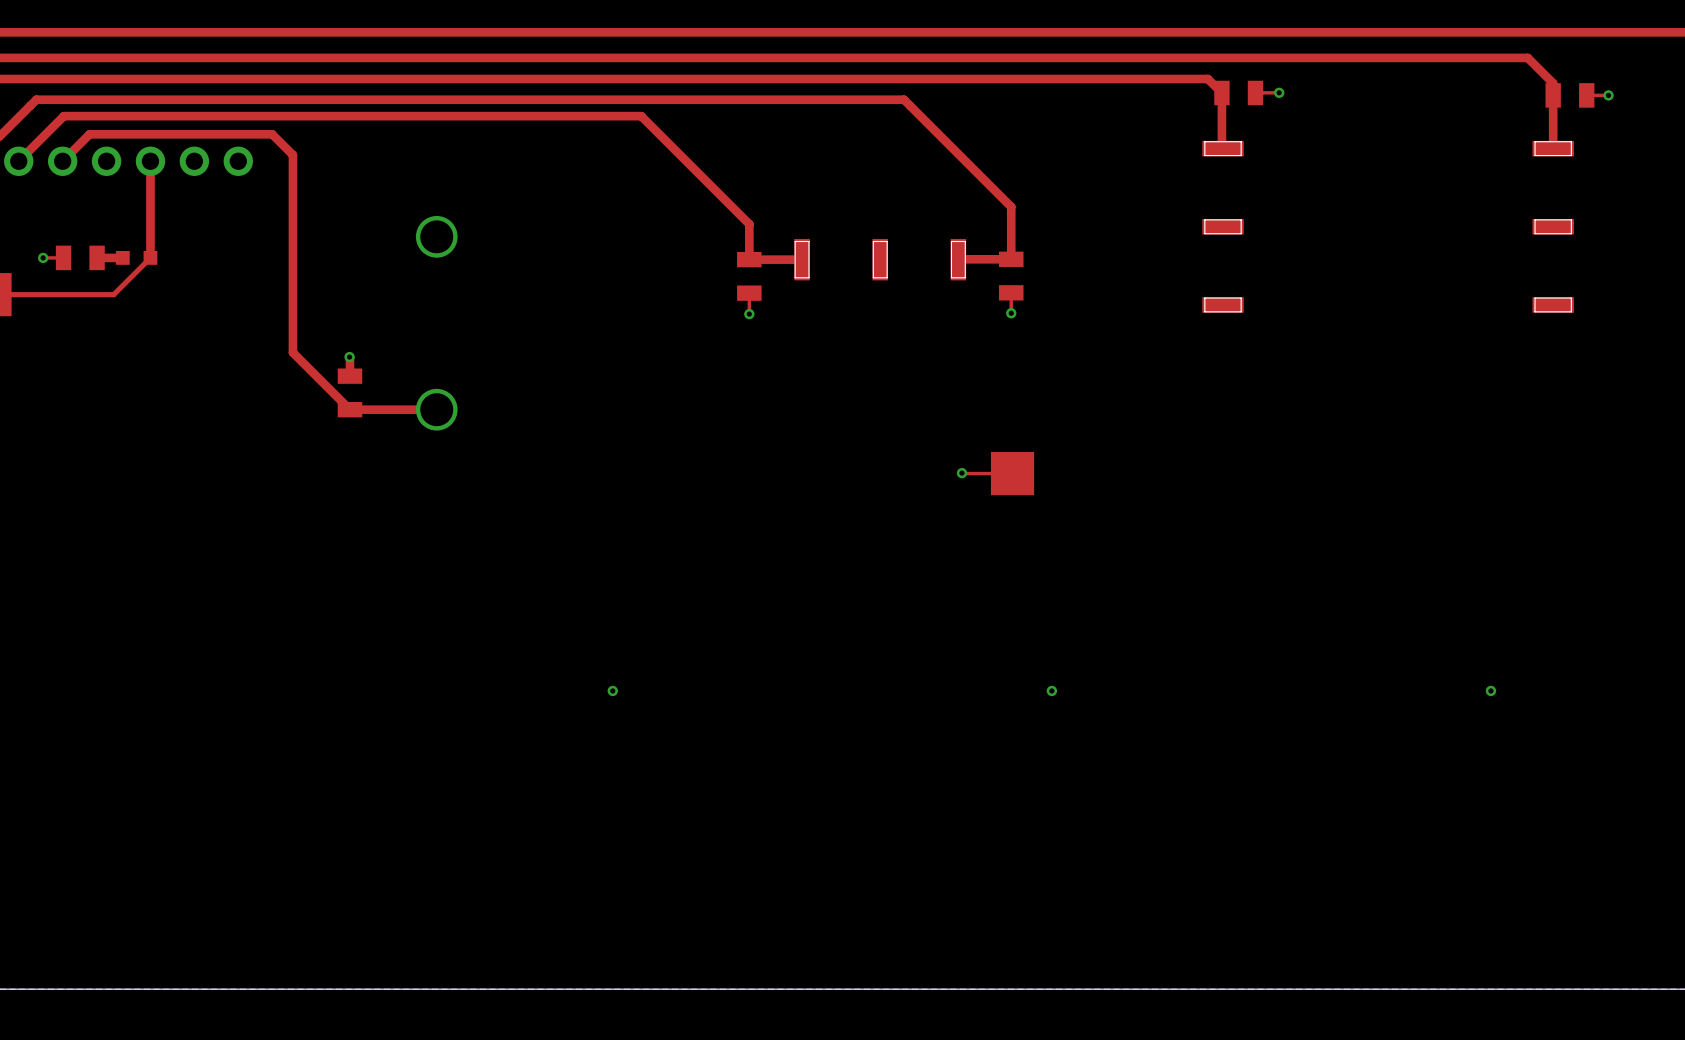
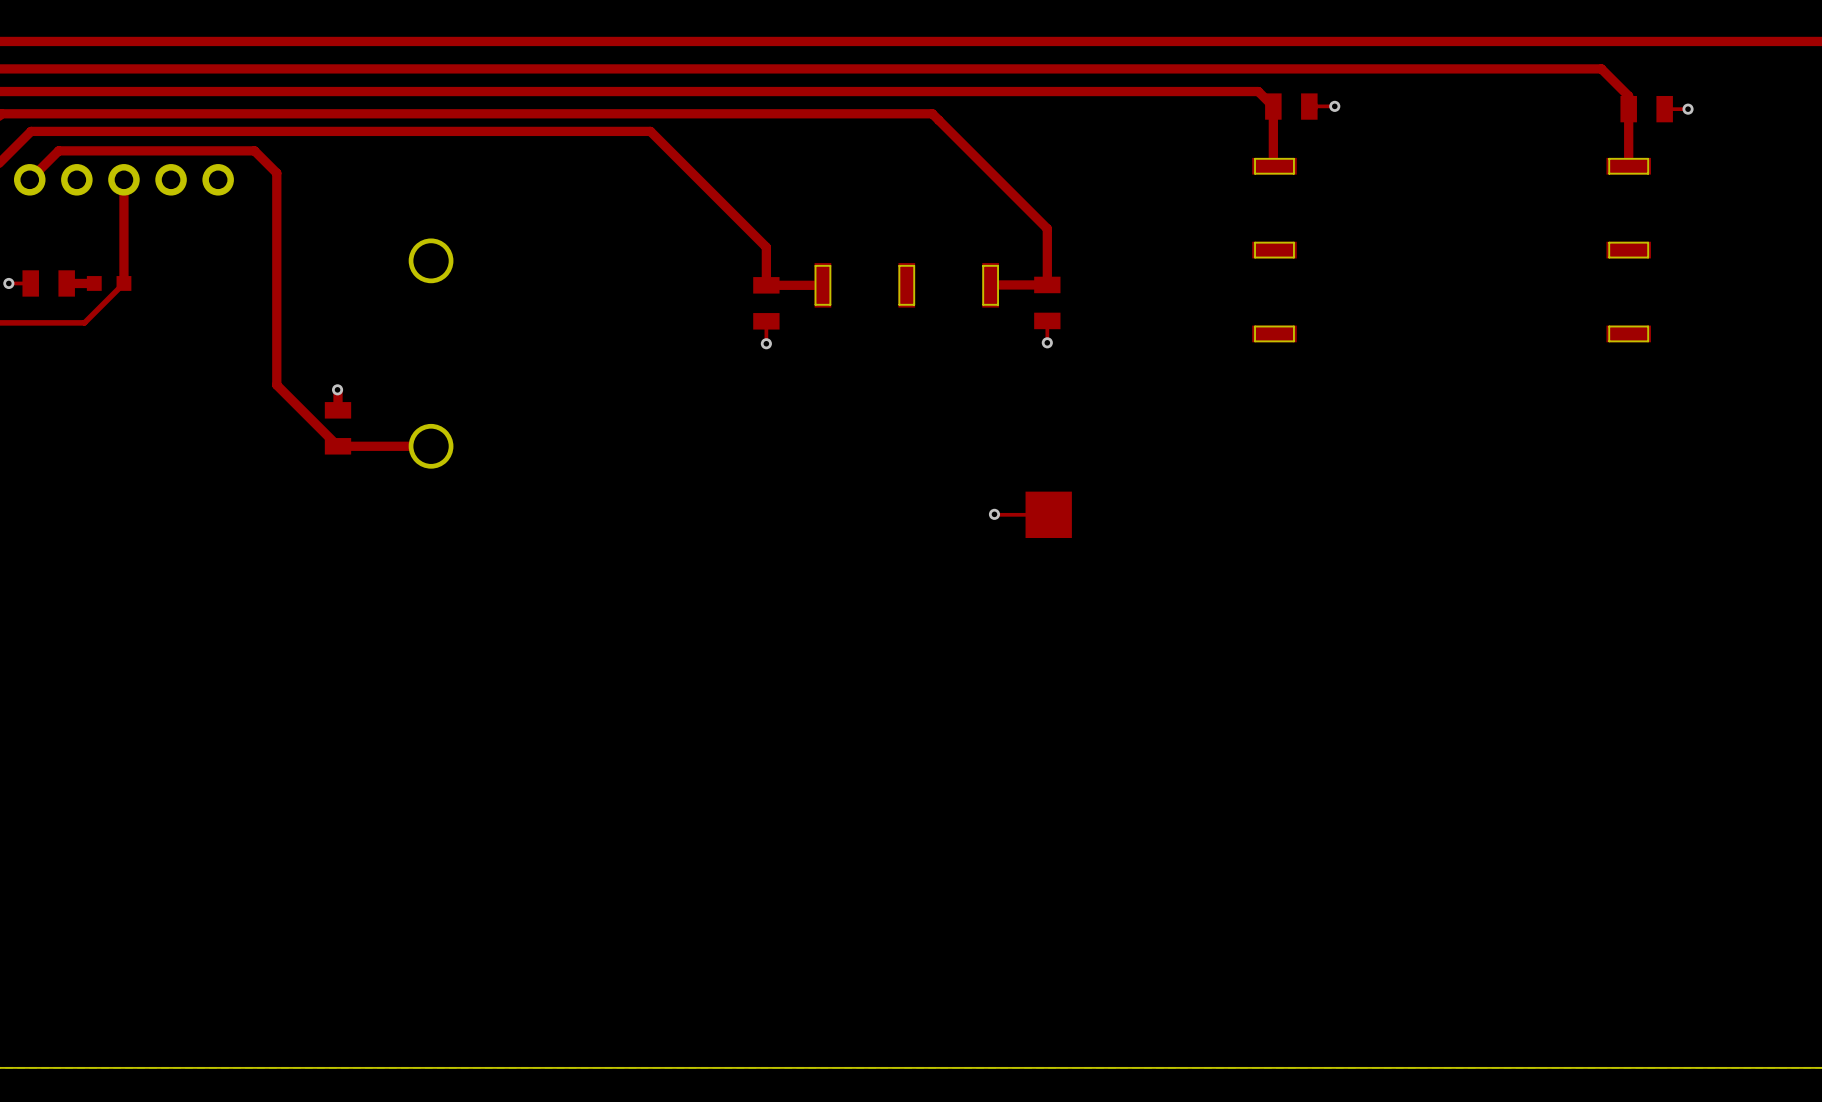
via: (612, 690) -> none
via: (1051, 690) -> none
via: (1490, 690) -> none

